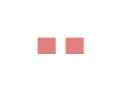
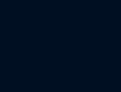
part: (60, 45) -> none

